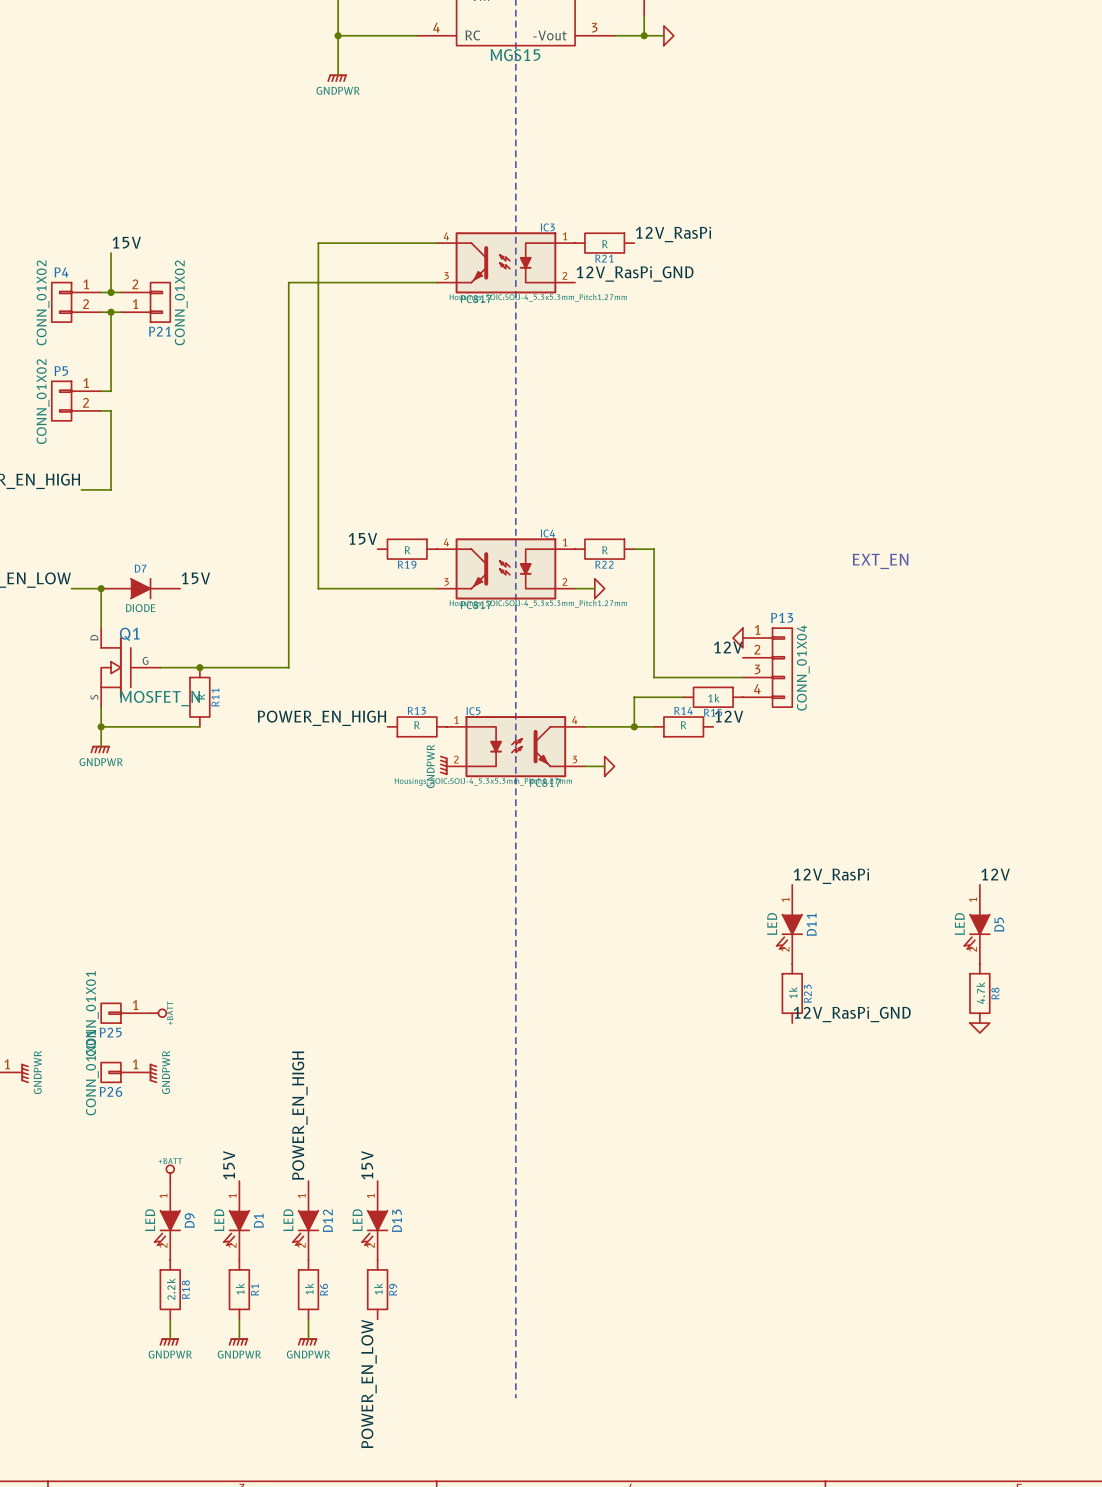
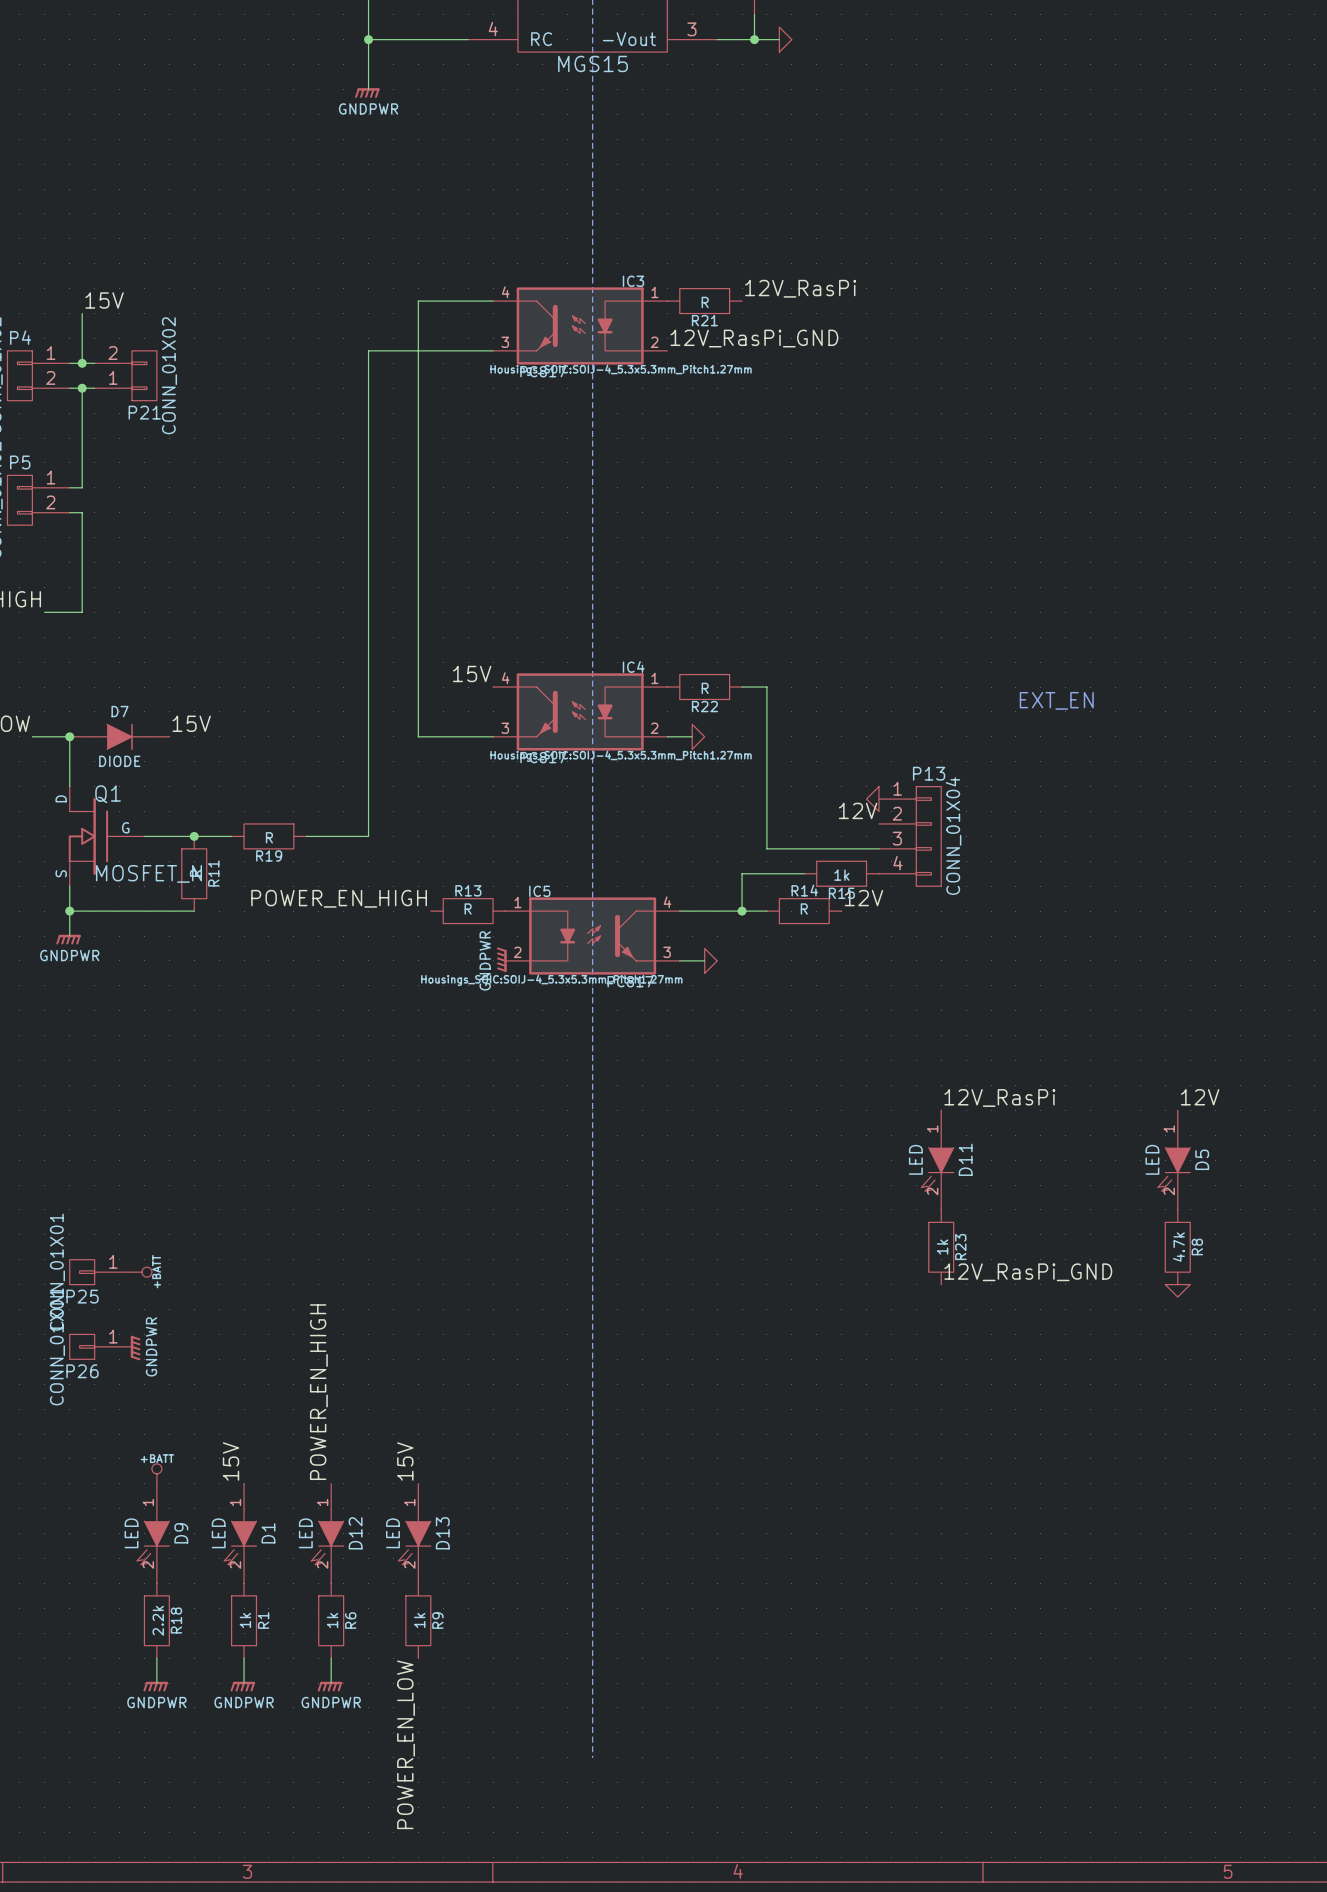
wire: (377, 243) (318, 243) (318, 588) (377, 588) -> (418, 301) (418, 736)
wire: (338, 282) (288, 282) (288, 667) (229, 667) -> (368, 350) (368, 836) (306, 836)
label position: 15V (362, 538) -> 15V (472, 673)
R19 position: (407, 549) -> (268, 836)

